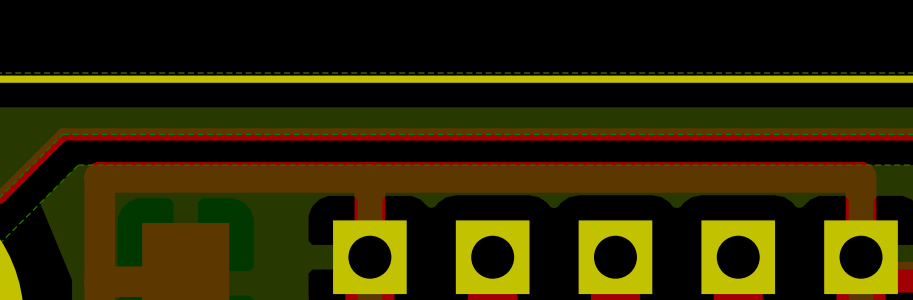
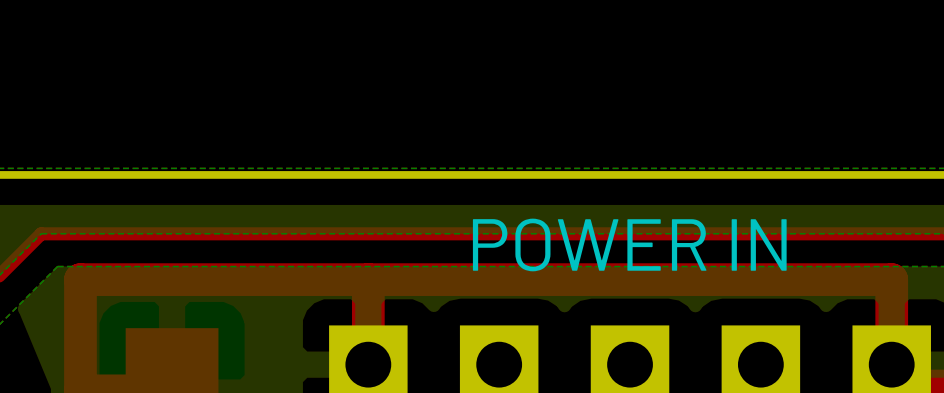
text: none -> POWER IN (629, 244)

